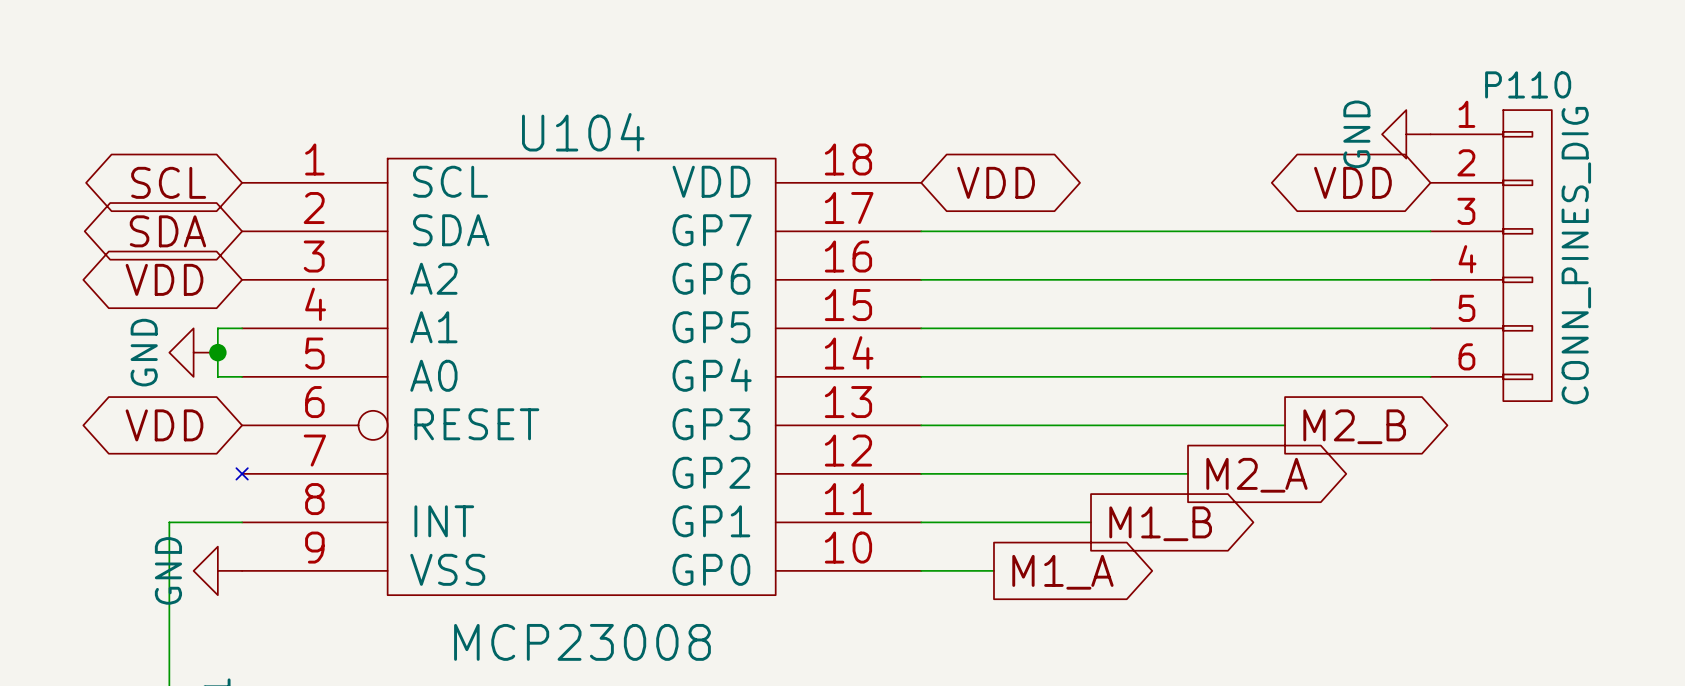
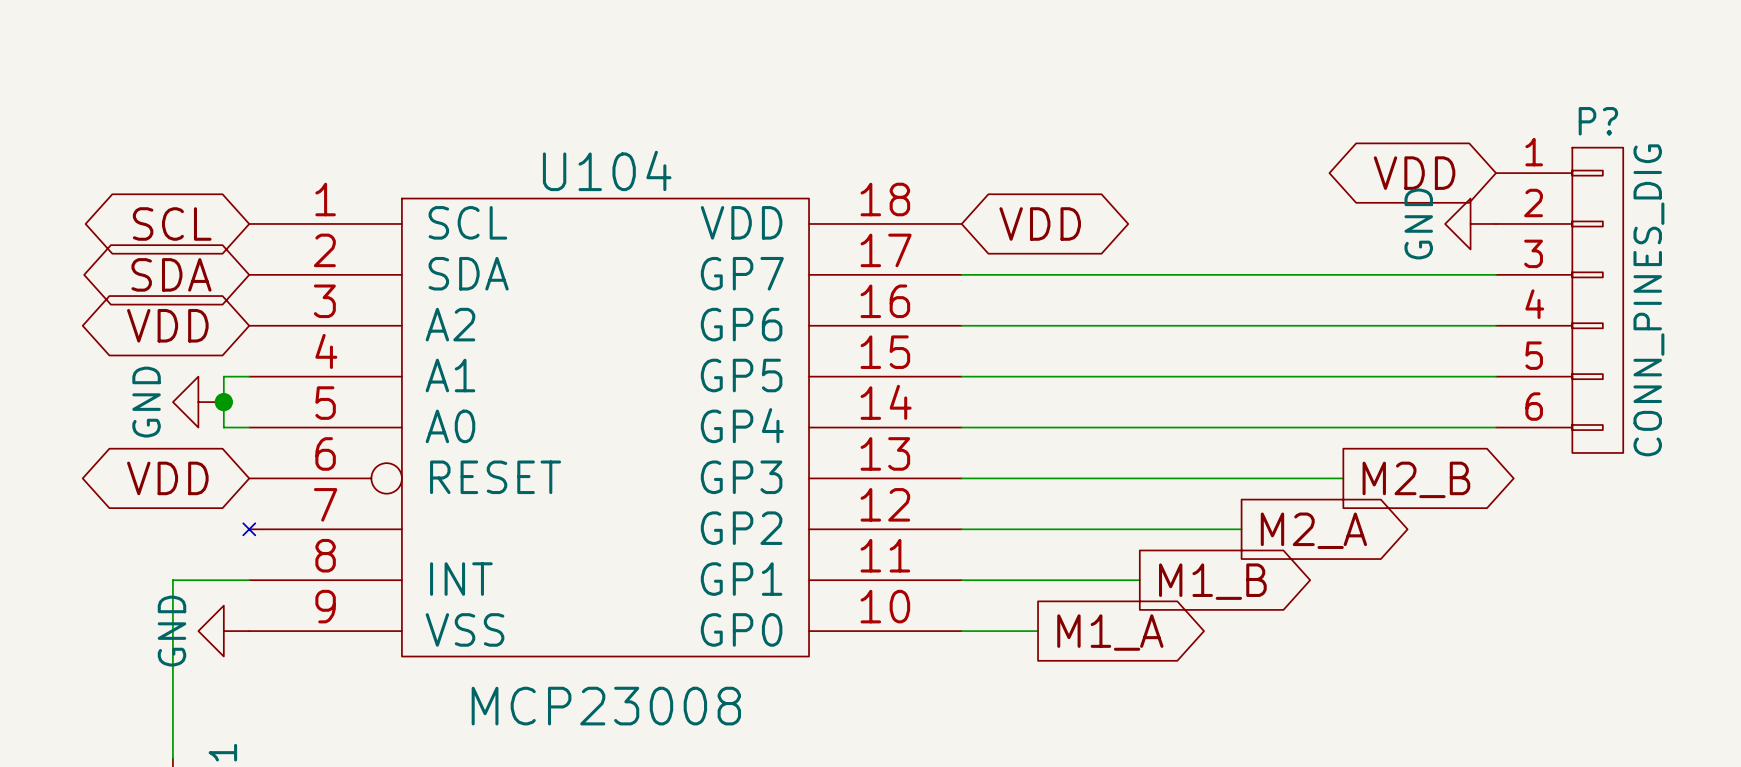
P110 name: P110 (1528, 84) -> P? (1598, 121)
power symbol position: GND (1406, 134) -> GND (1470, 223)
global label position: VDD (1352, 182) -> VDD (1414, 173)

